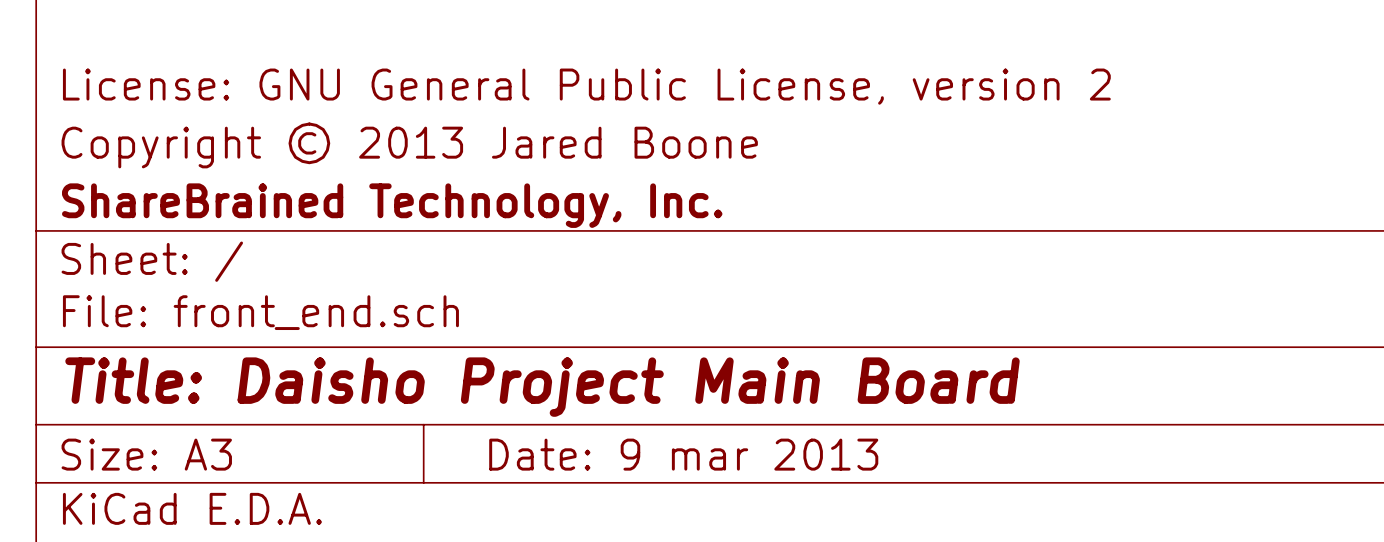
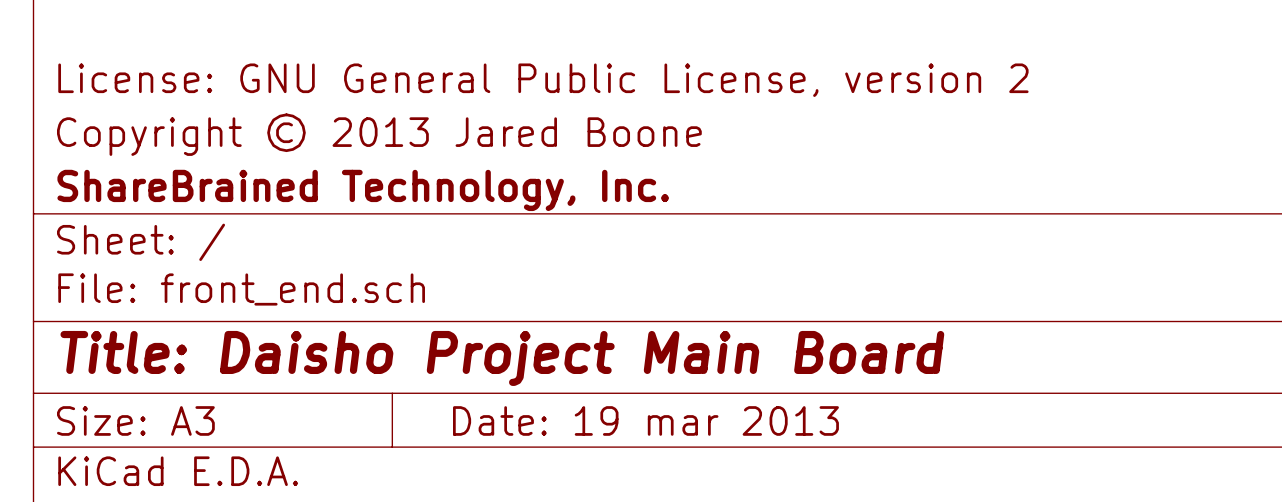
title block: Date: 9 mar 2013 (683, 454) -> Date: 19 mar 2013 (645, 420)

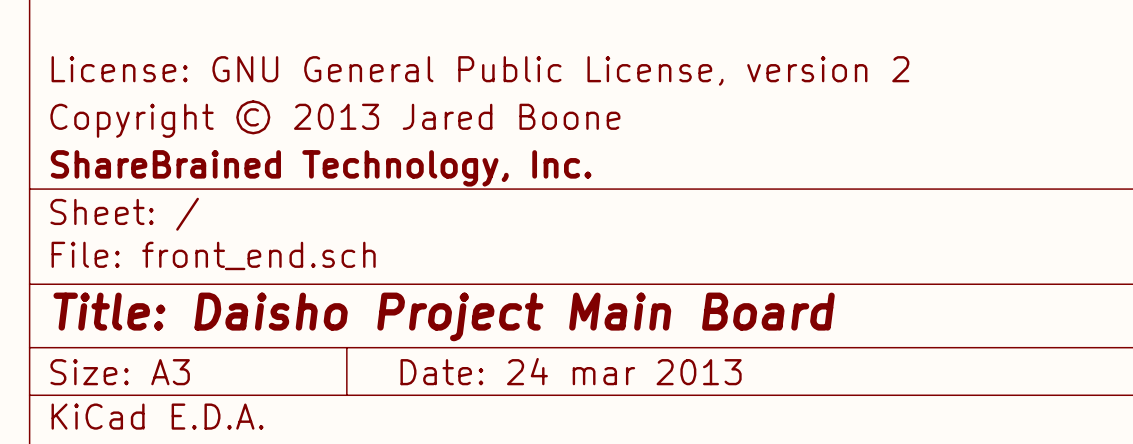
title block: Date: 19 mar 2013 (645, 420) -> Date: 24 mar 2013 (571, 371)

